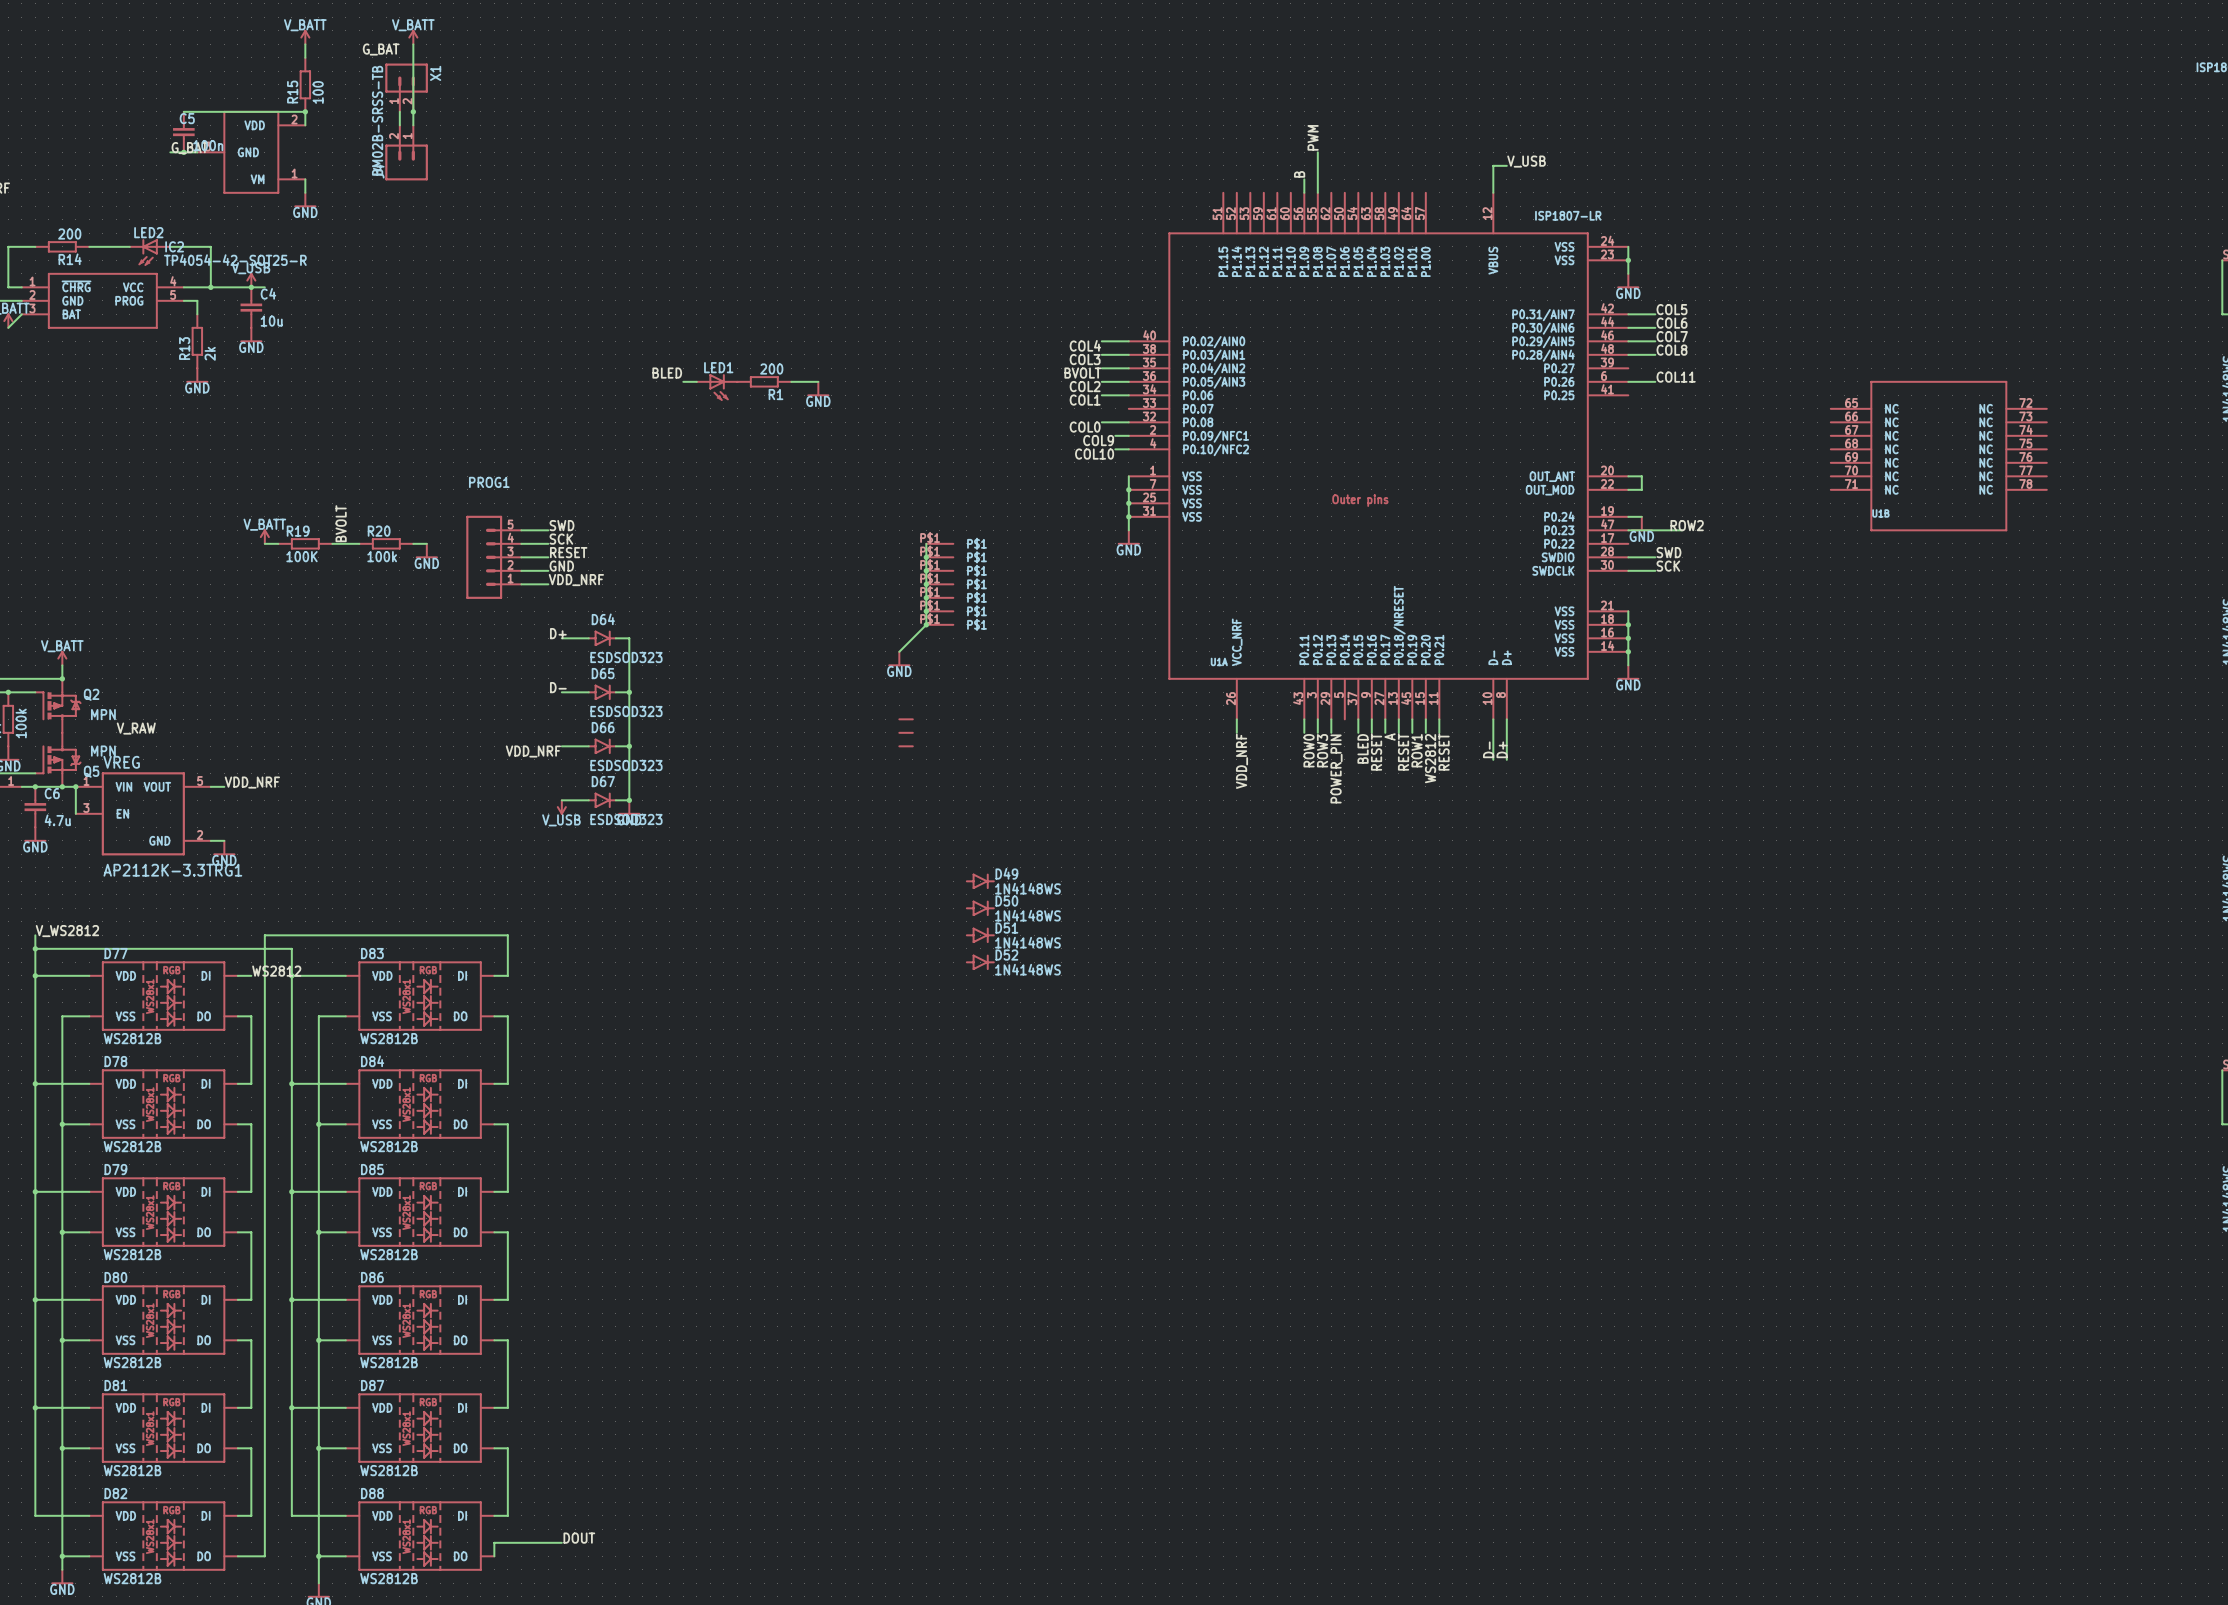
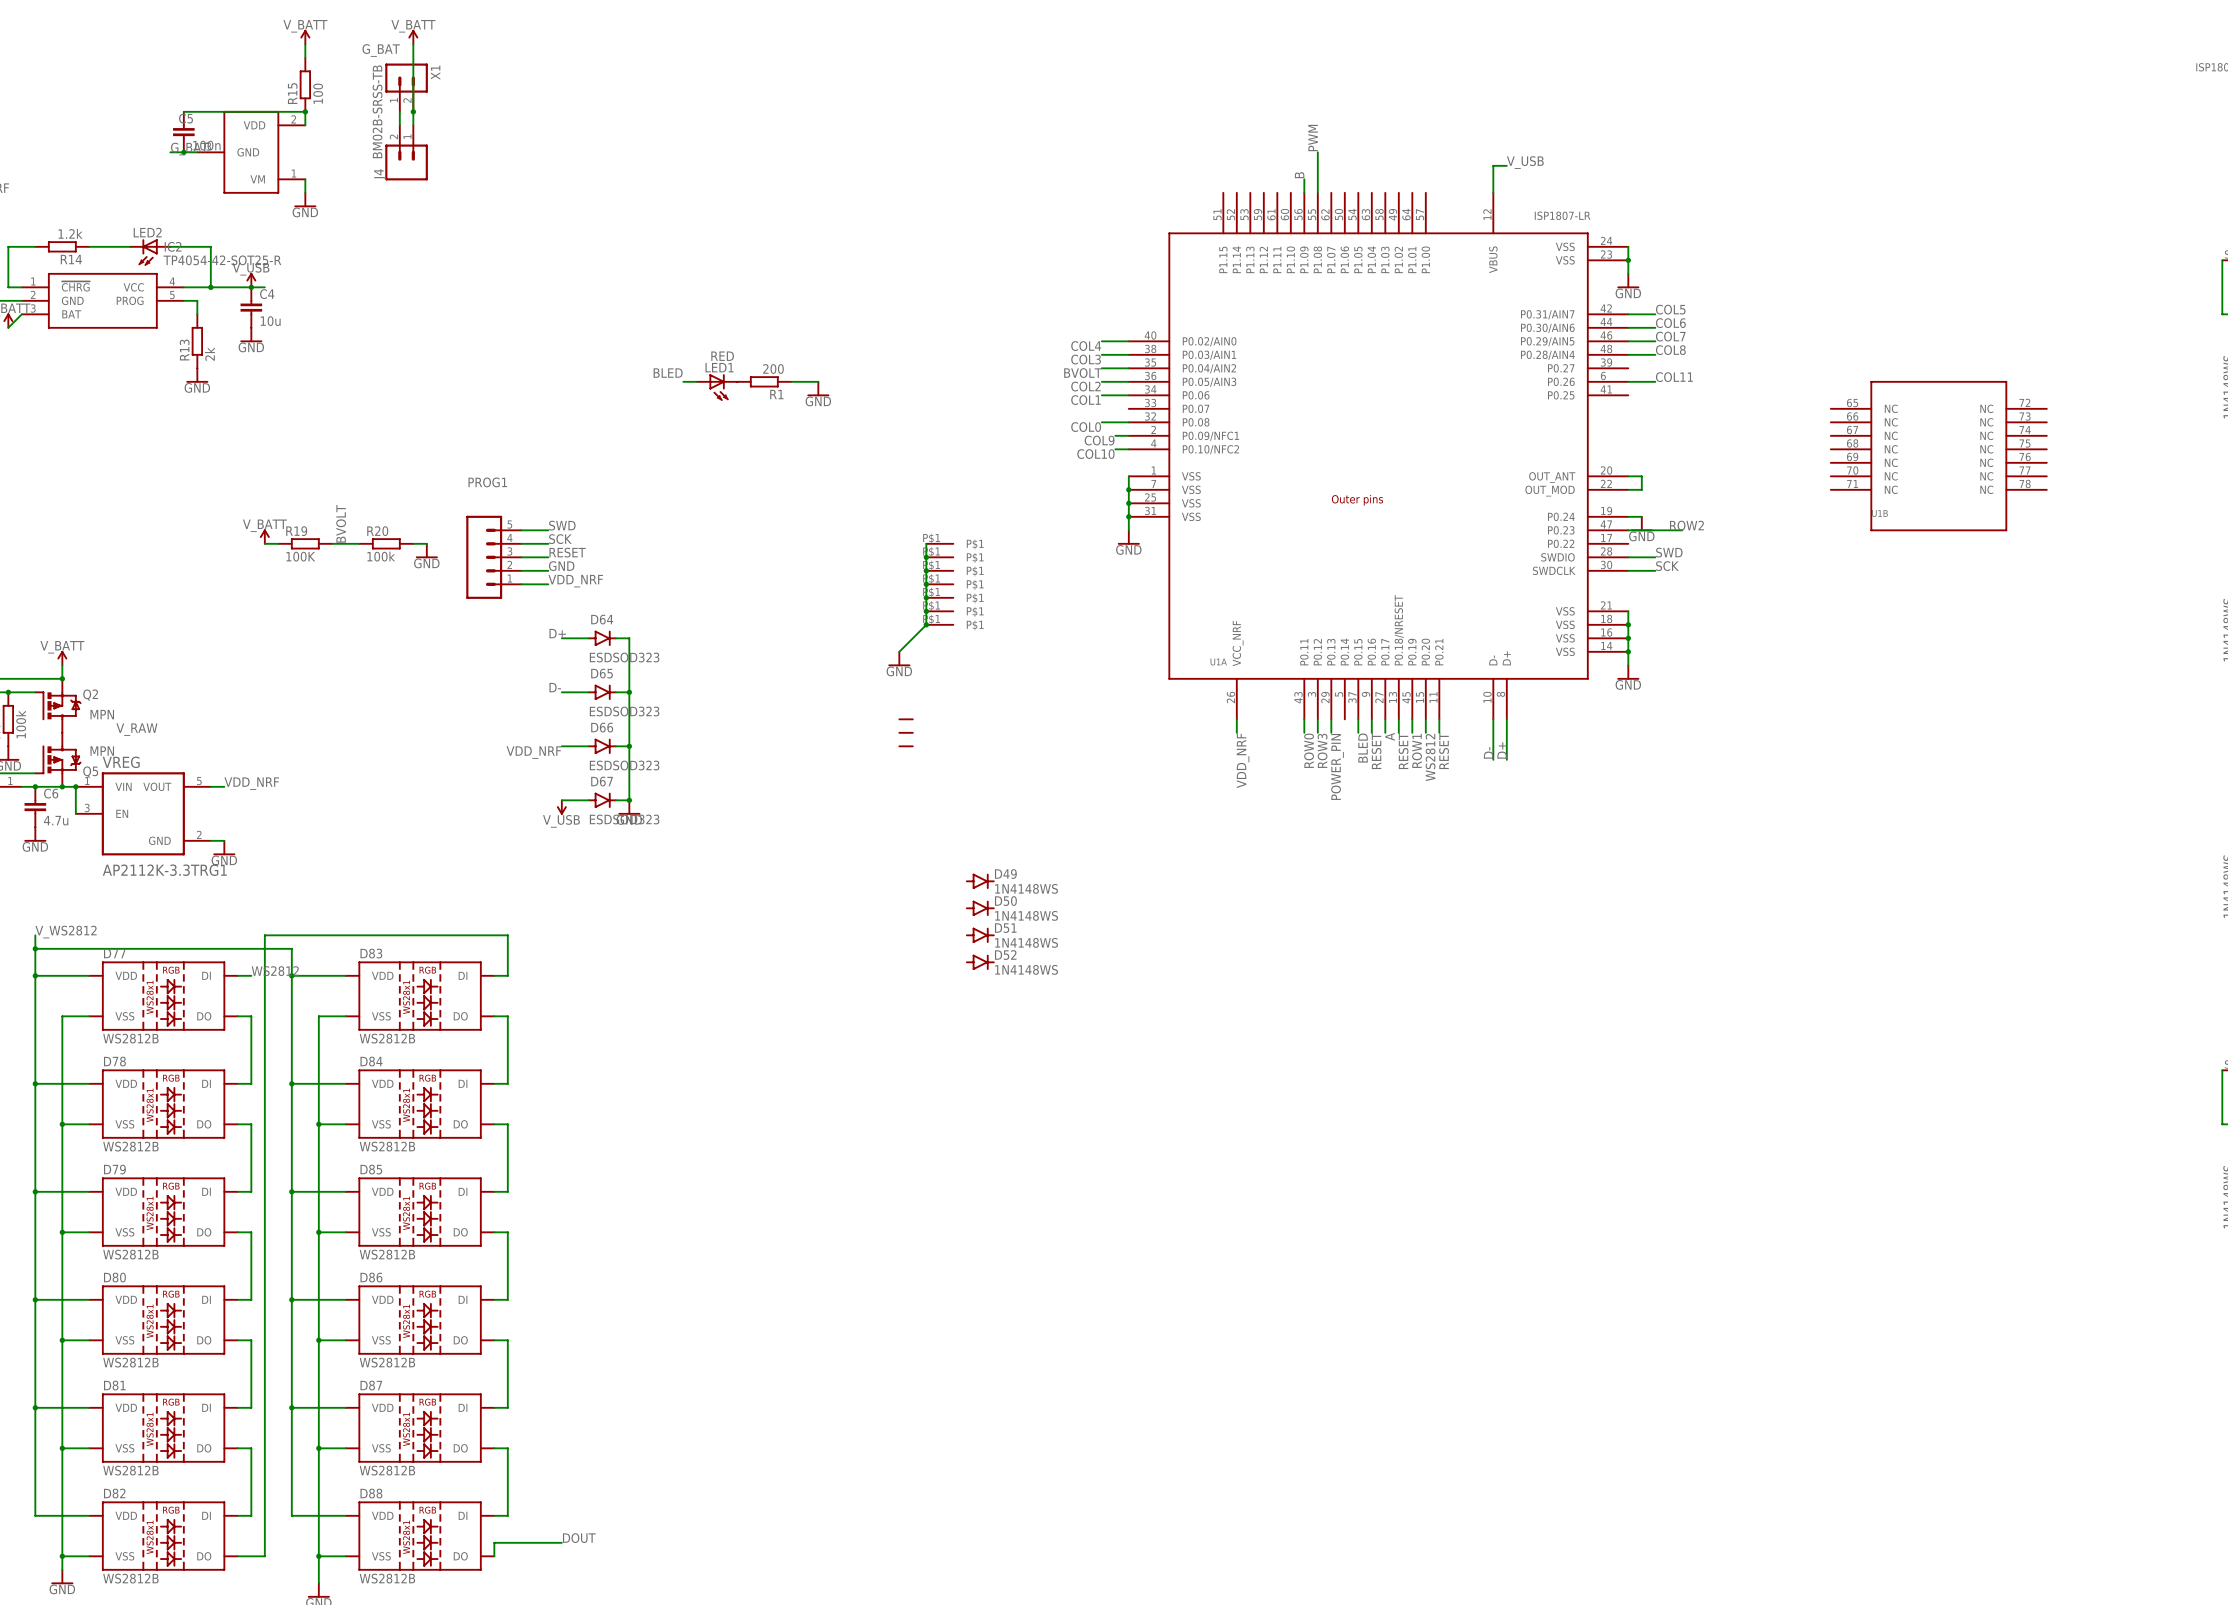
R14 value: 200 (69, 234) -> 1.2k (70, 233)
LED1 value: none -> RED (722, 356)

